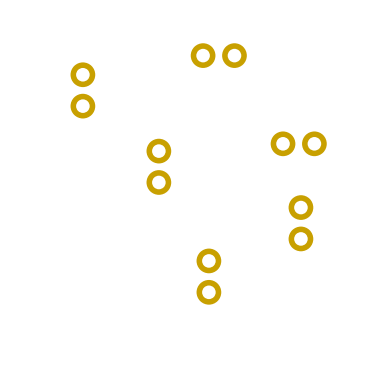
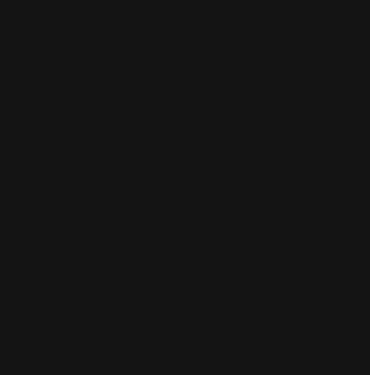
part: (218, 55) -> none
part: (82, 90) -> none
part: (298, 143) -> none
part: (158, 166) -> none
part: (300, 223) -> none
part: (208, 276) -> none

